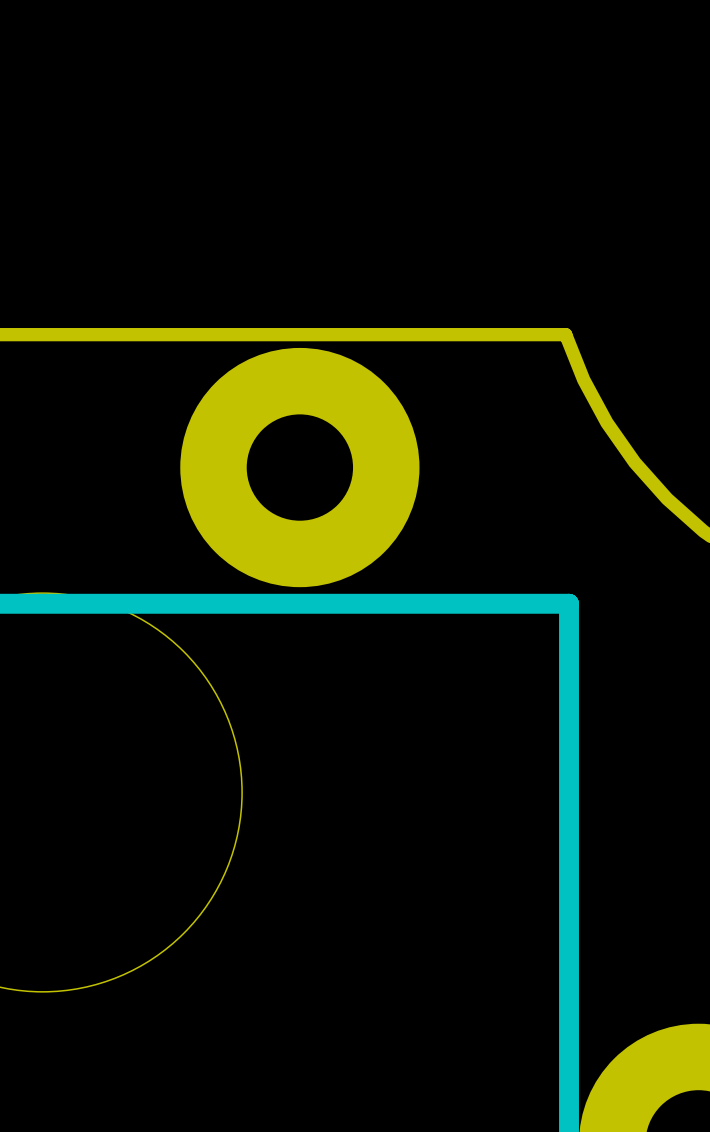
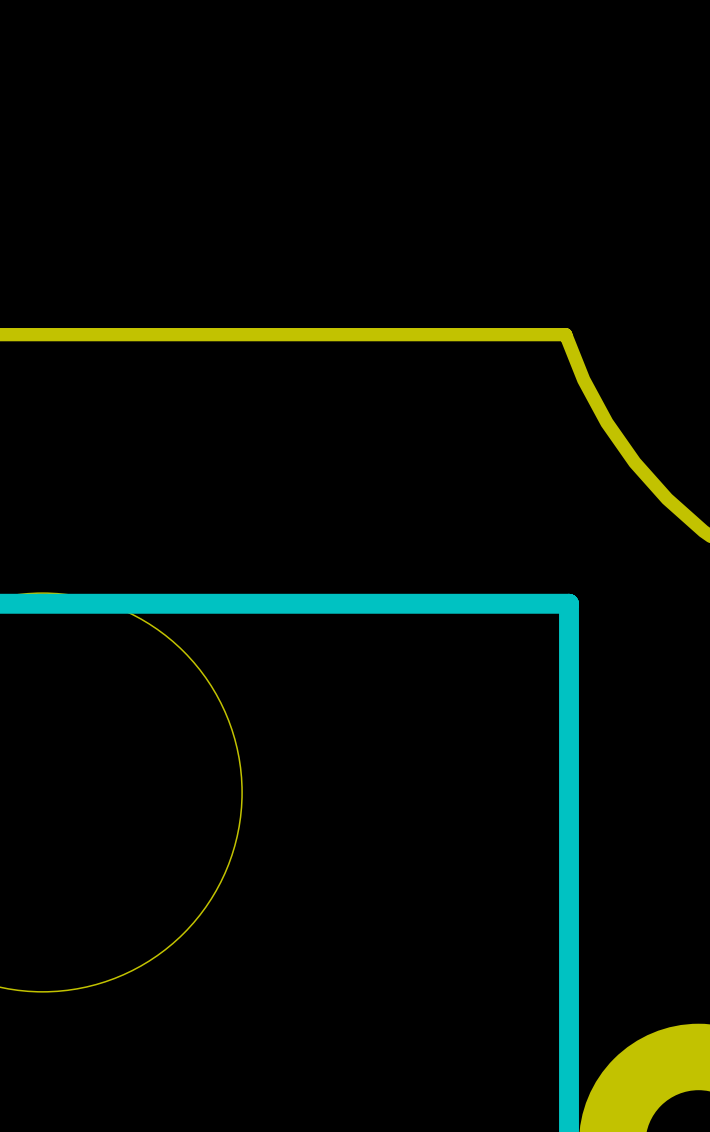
part: (299, 467) -> none

